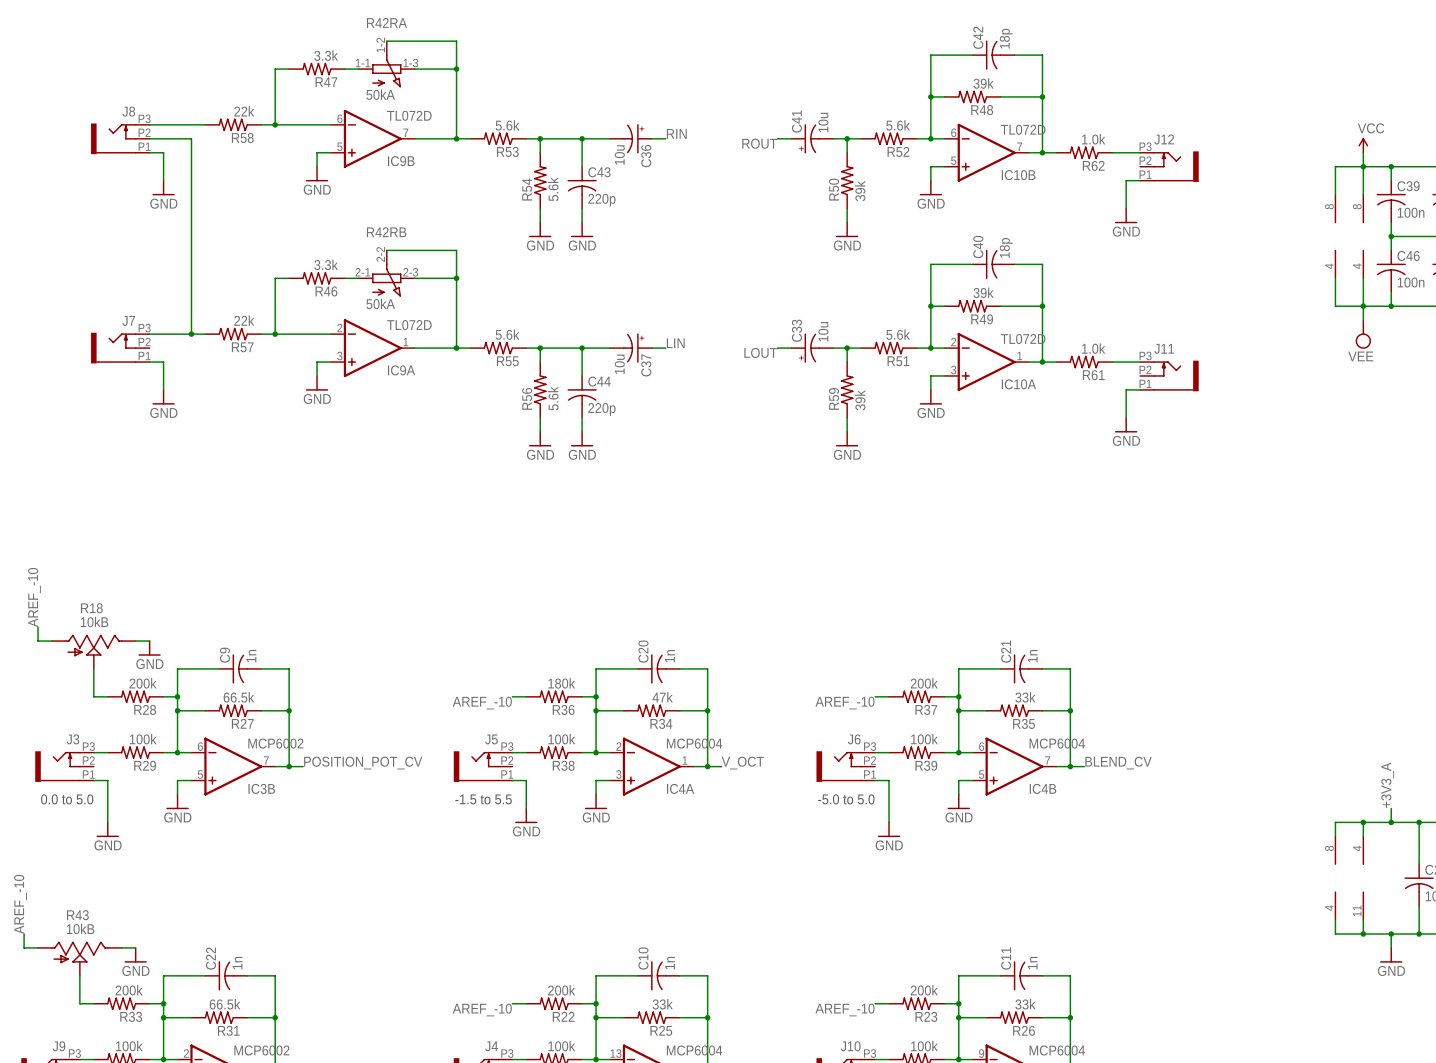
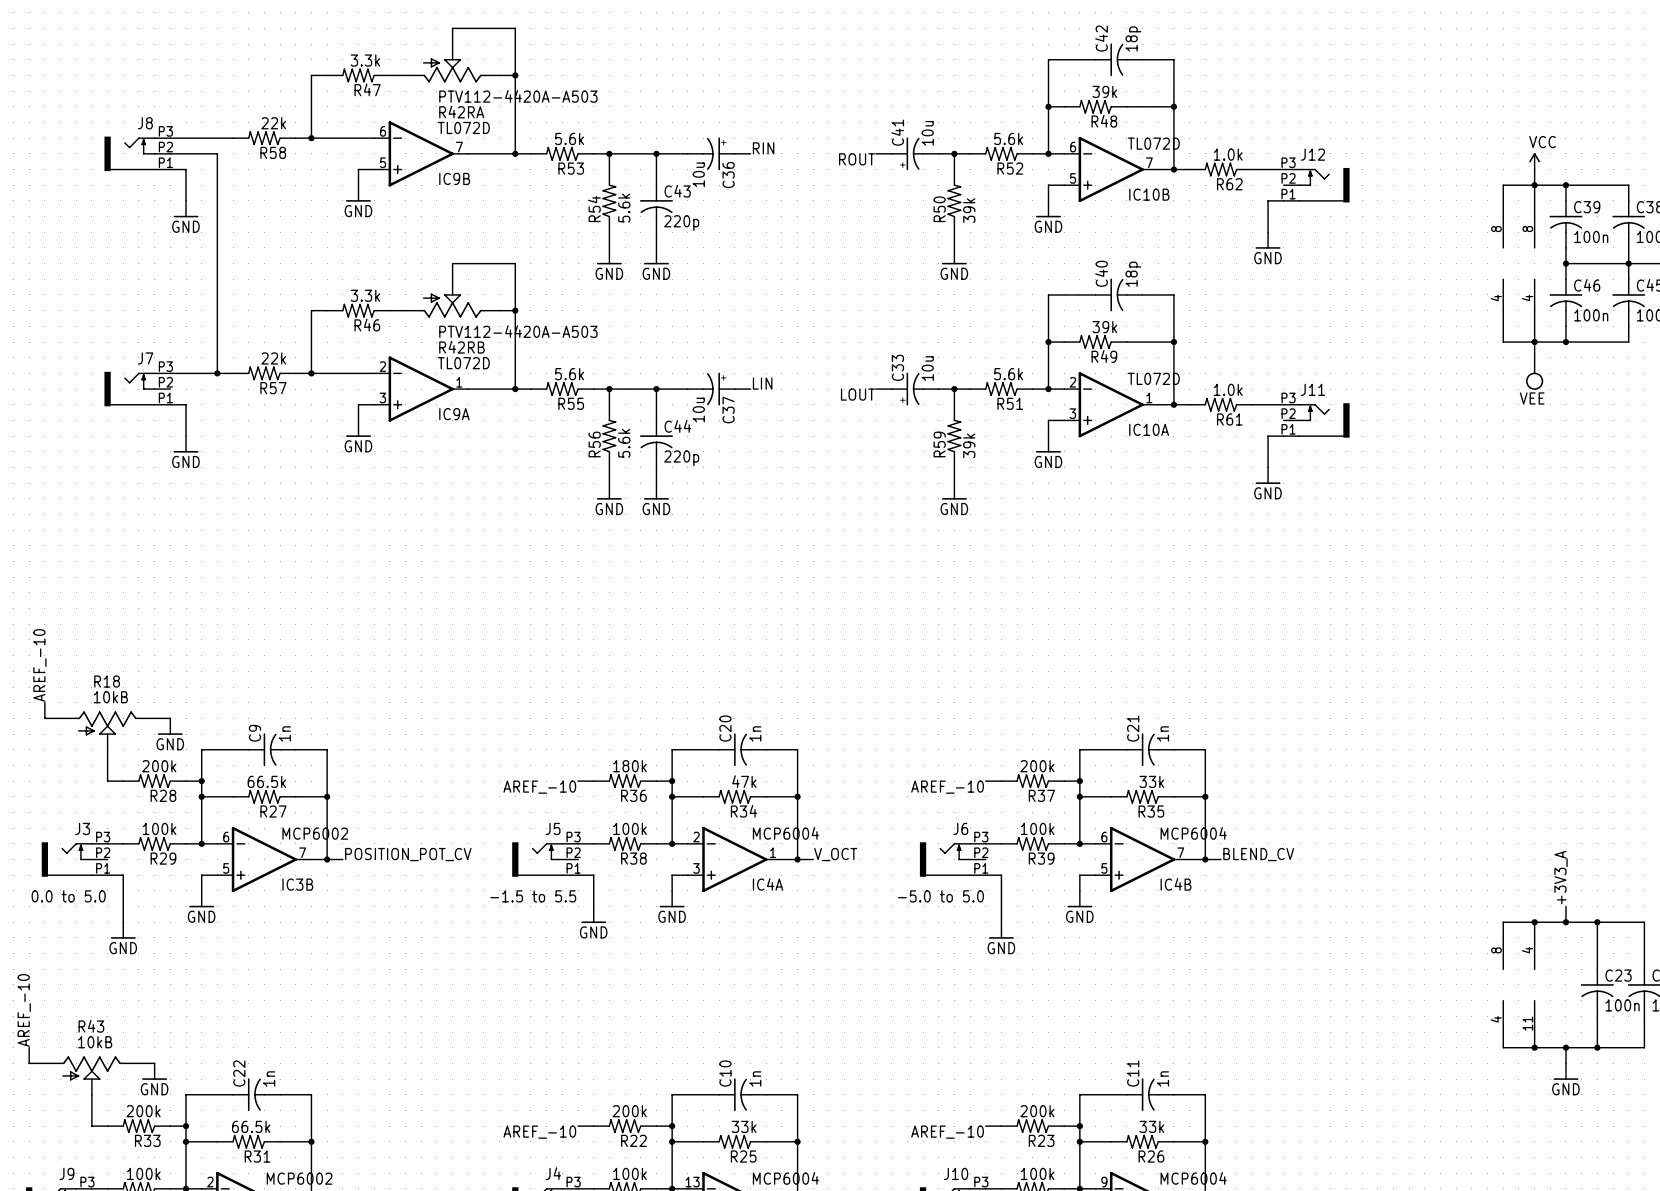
R42RA name position: R42RA (386, 22) -> R42RA (461, 112)
R42RA symbol: [358, 41, 415, 88] -> [405, 44, 500, 83]
wire: (386, 41) (456, 41) -> (452, 44) (452, 28) (515, 28) (515, 44)
R42RA value: 50kA (380, 94) -> PTV112-4420A-A503 (518, 96)
R42RB name position: R42RB (386, 232) -> R42RB (461, 347)
R42RB symbol: [358, 250, 415, 297] -> [405, 279, 500, 318]
wire: (386, 250) (456, 250) -> (452, 279) (452, 263) (515, 263) (515, 279)
R42RB value: 50kA (380, 303) -> PTV112-4420A-A503 (518, 331)

